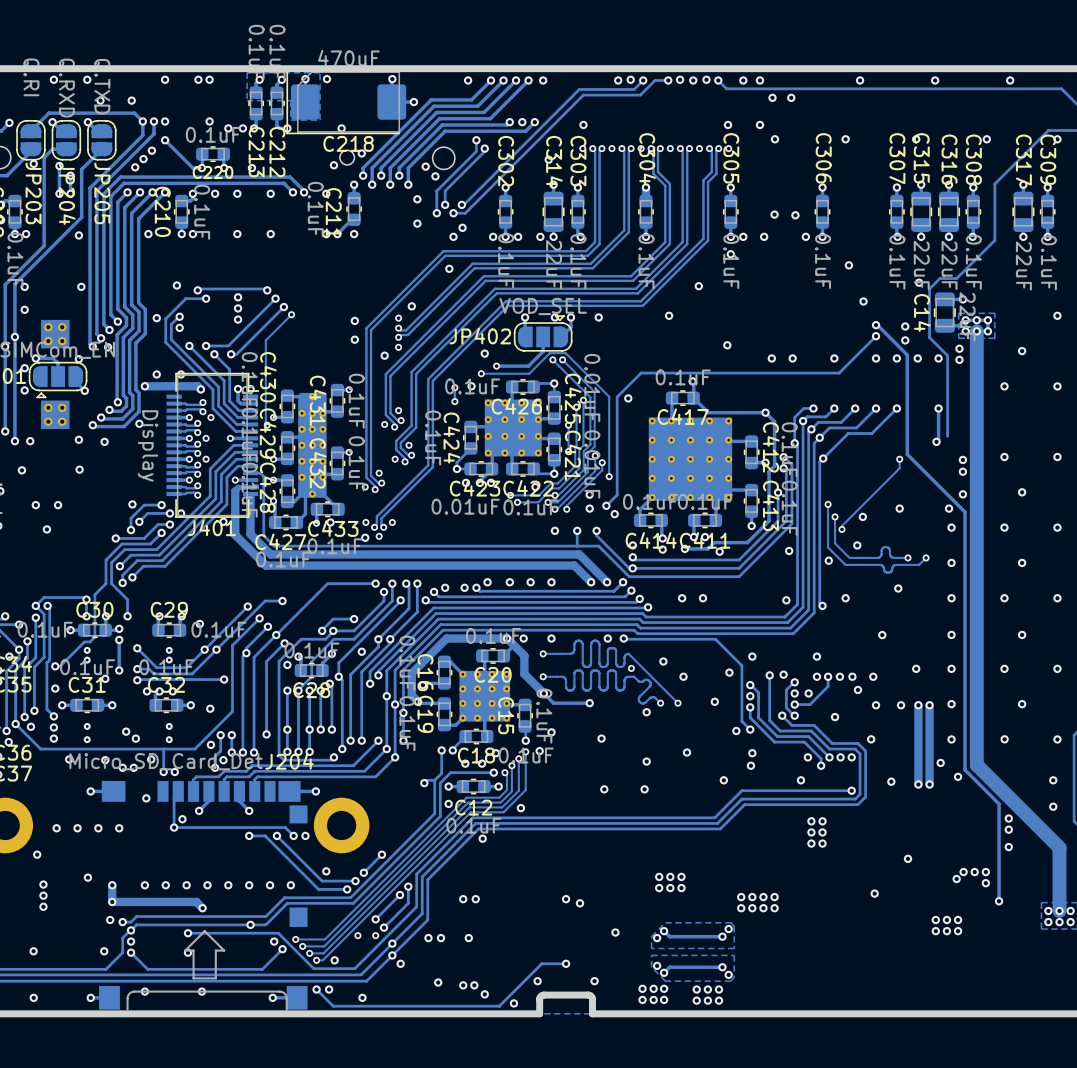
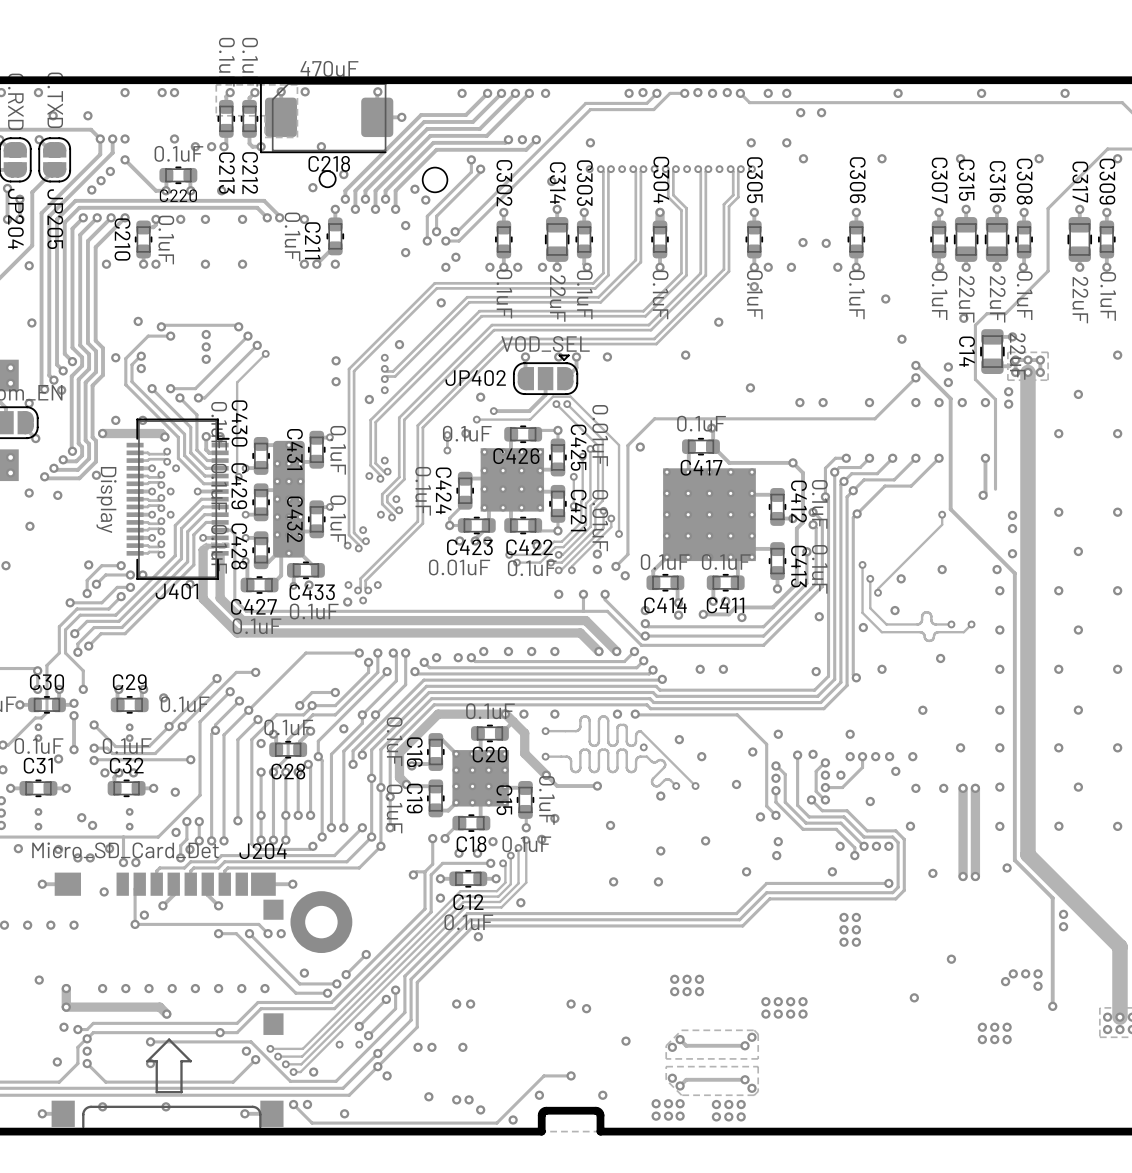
via: (940, 762) -> none
via: (1053, 780) -> none
via: (1053, 806) -> none
via: (1008, 847) -> none

